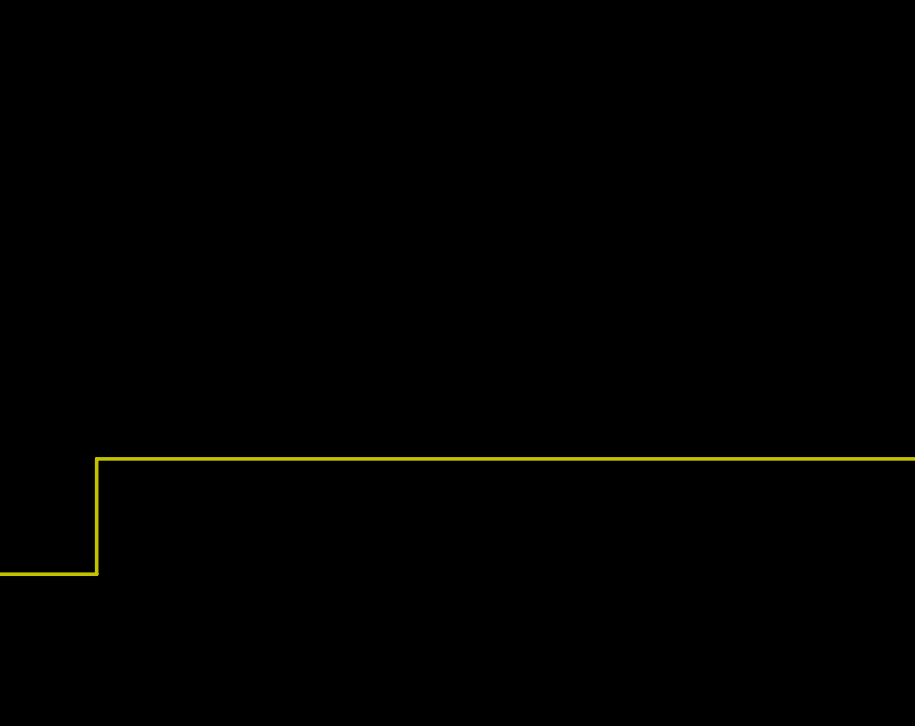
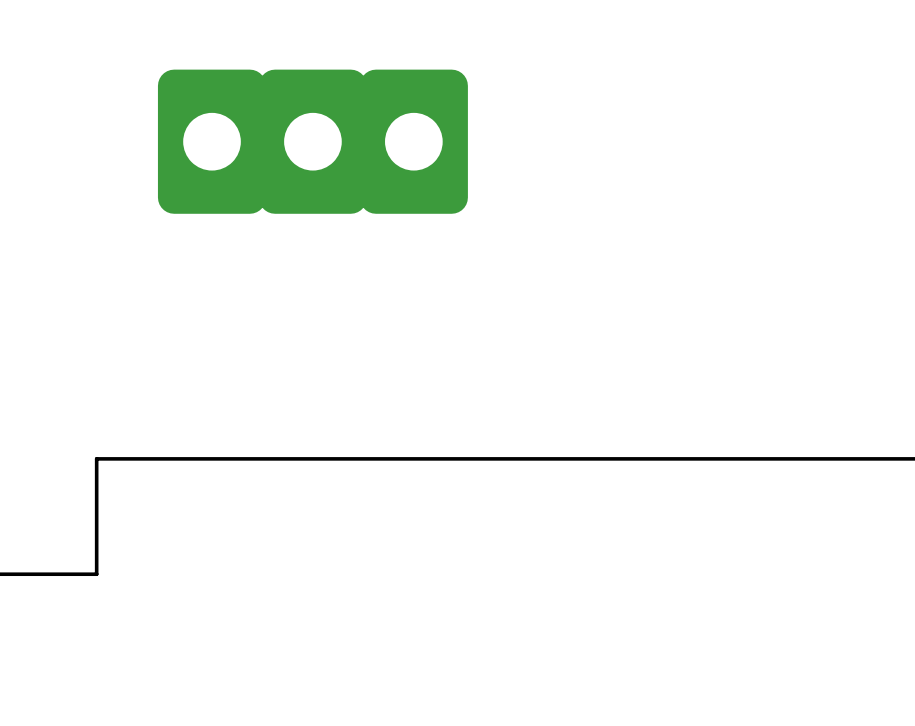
part: none -> (312, 141)

